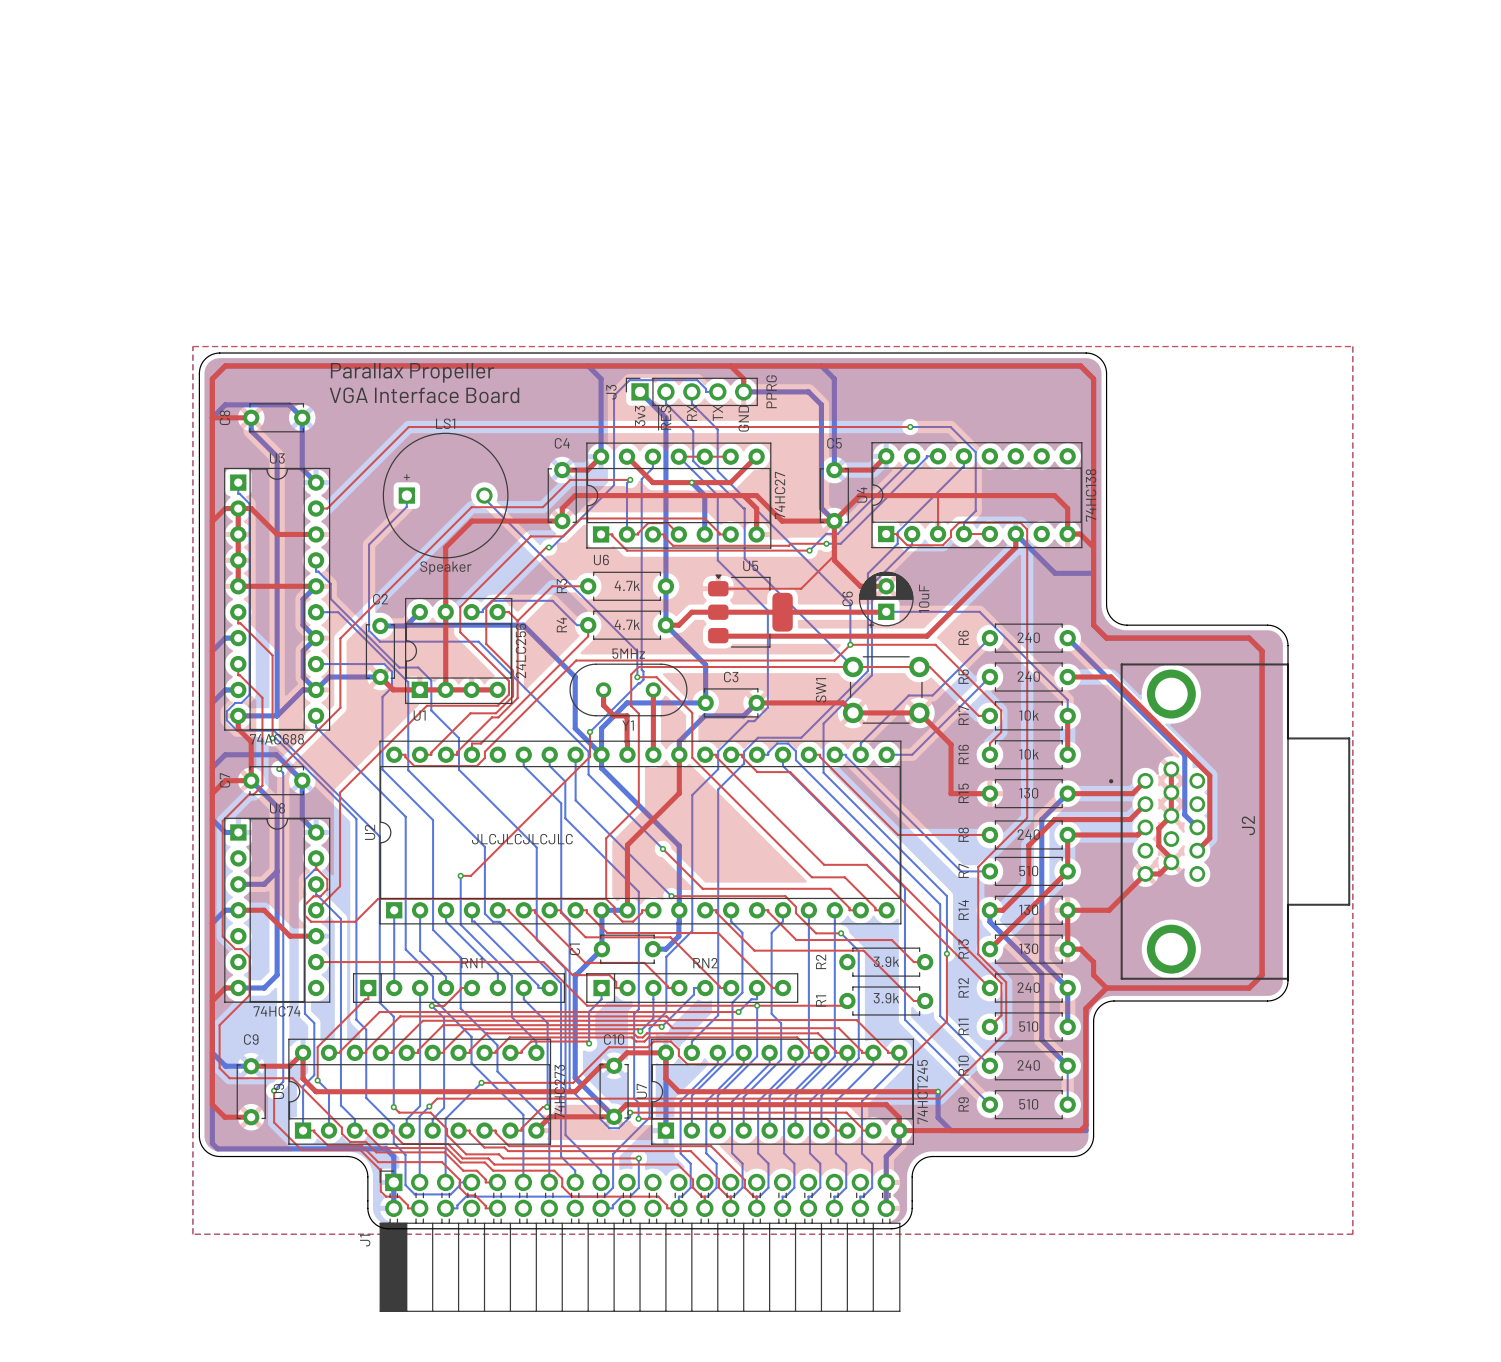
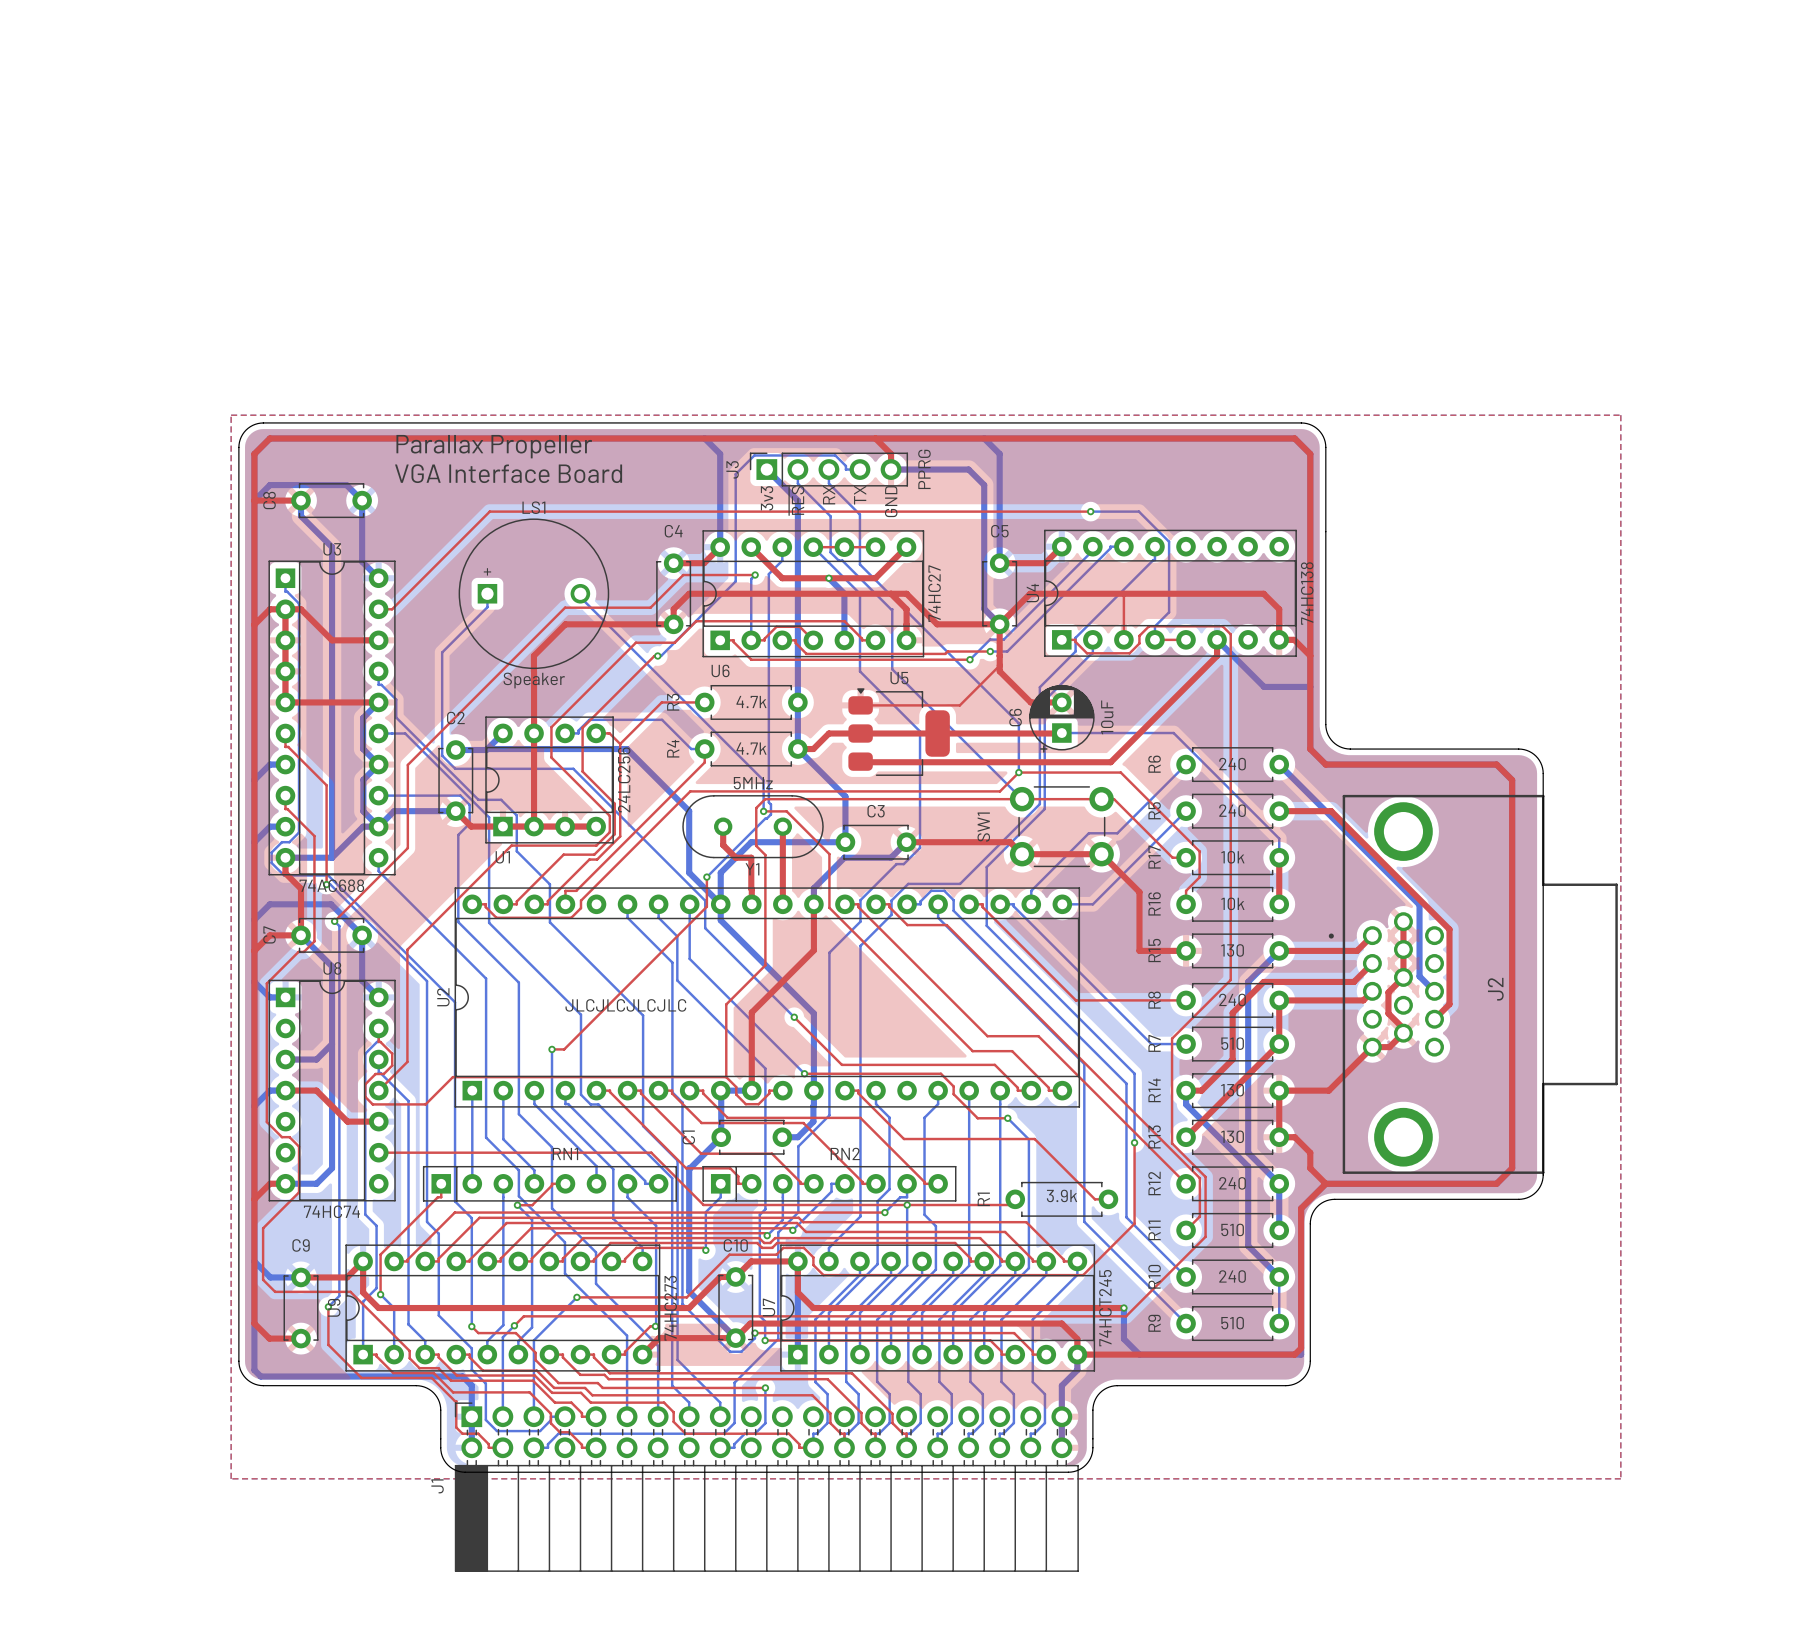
top track: (757, 910) (768, 910) (796, 940) (891, 940) (913, 962) (925, 962) -> none
R2: 3.9k (886, 962) -> none

